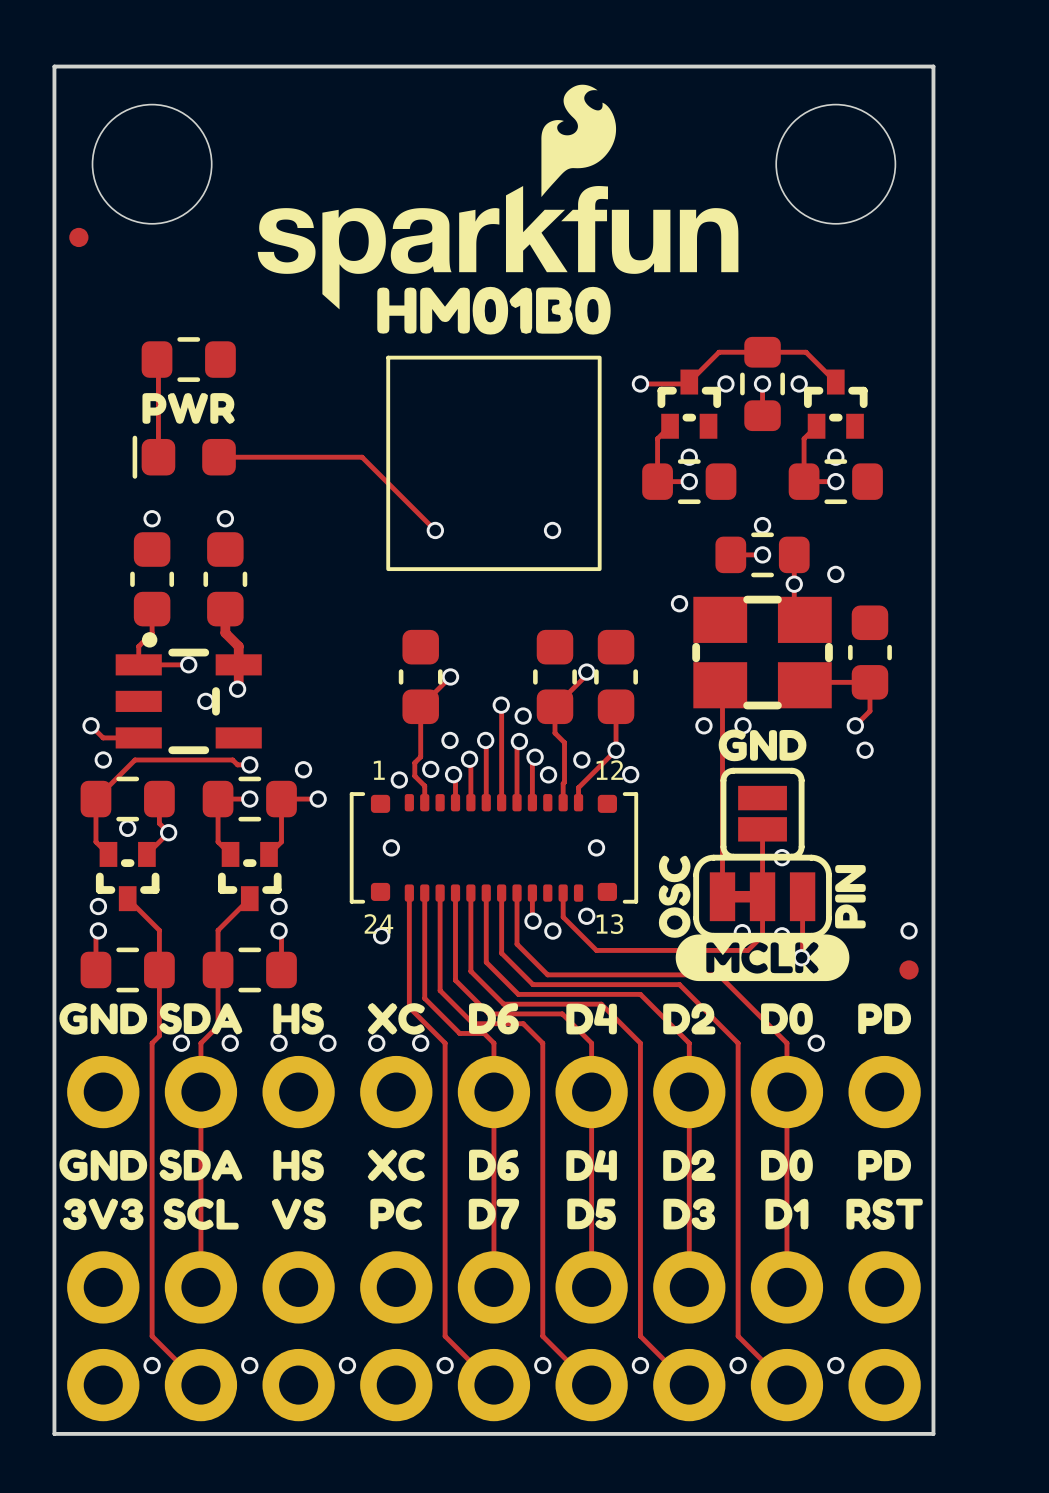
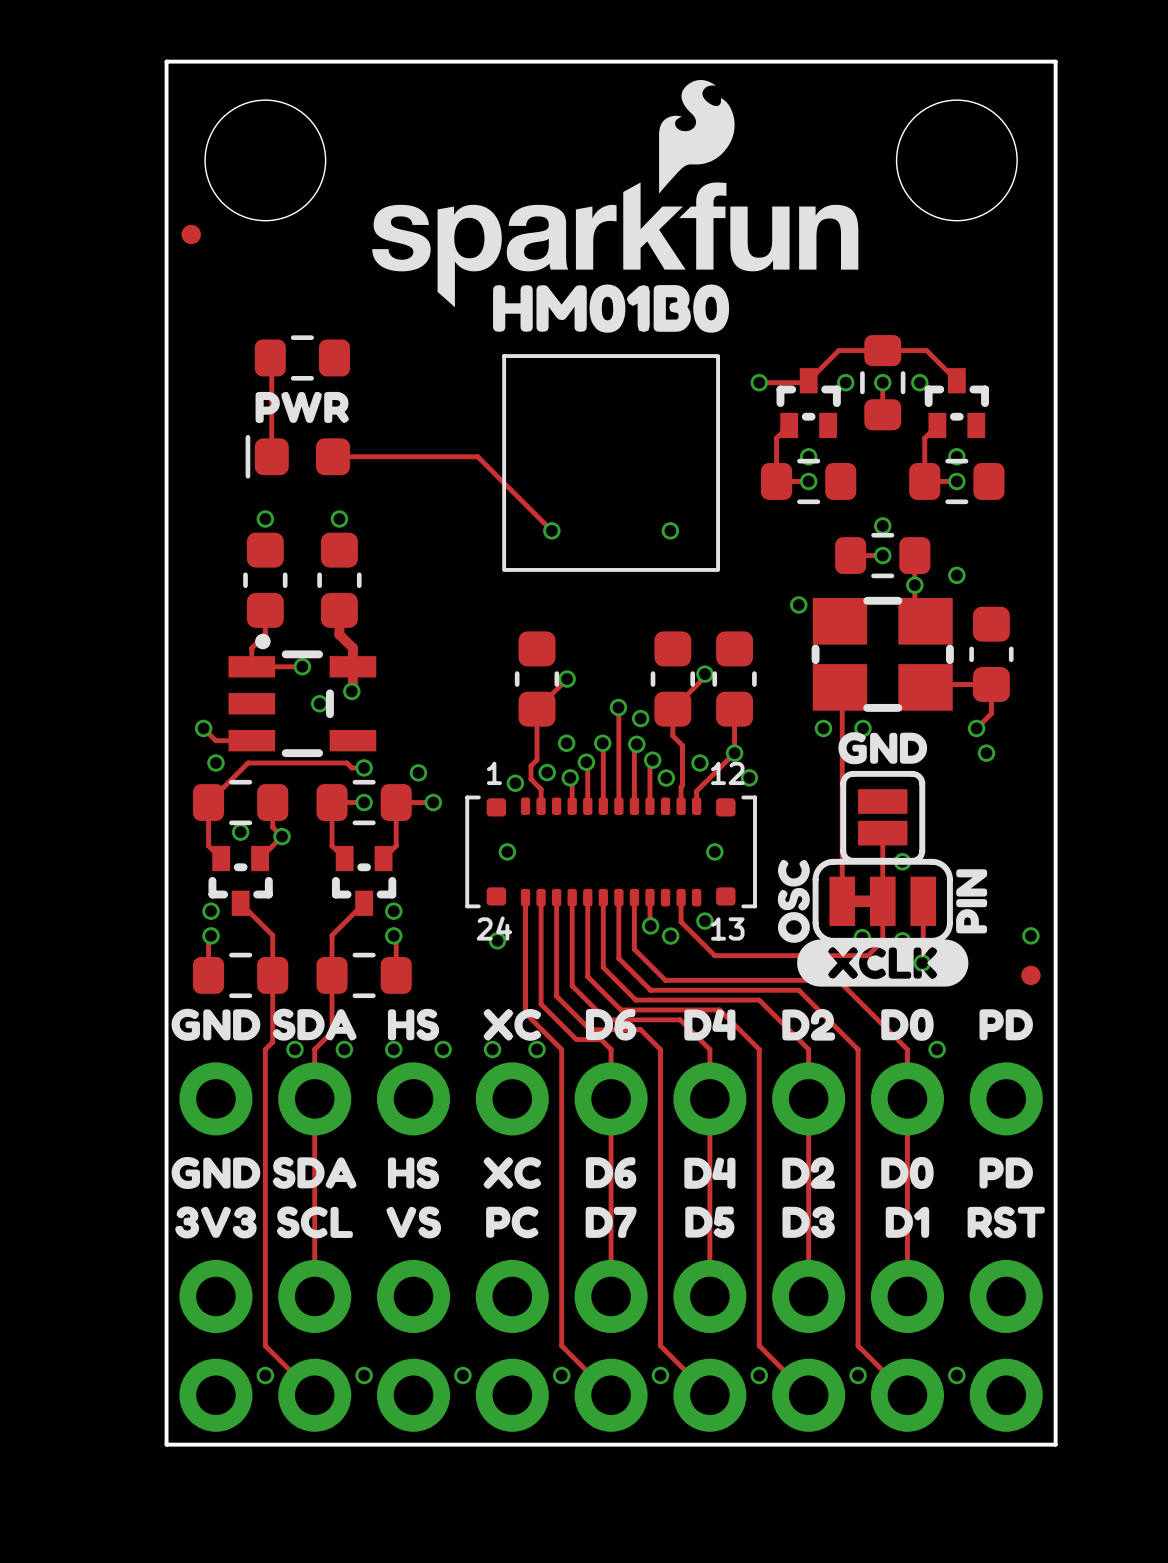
drawing shape: [675, 934, 850, 982] -> [797, 939, 969, 987]

